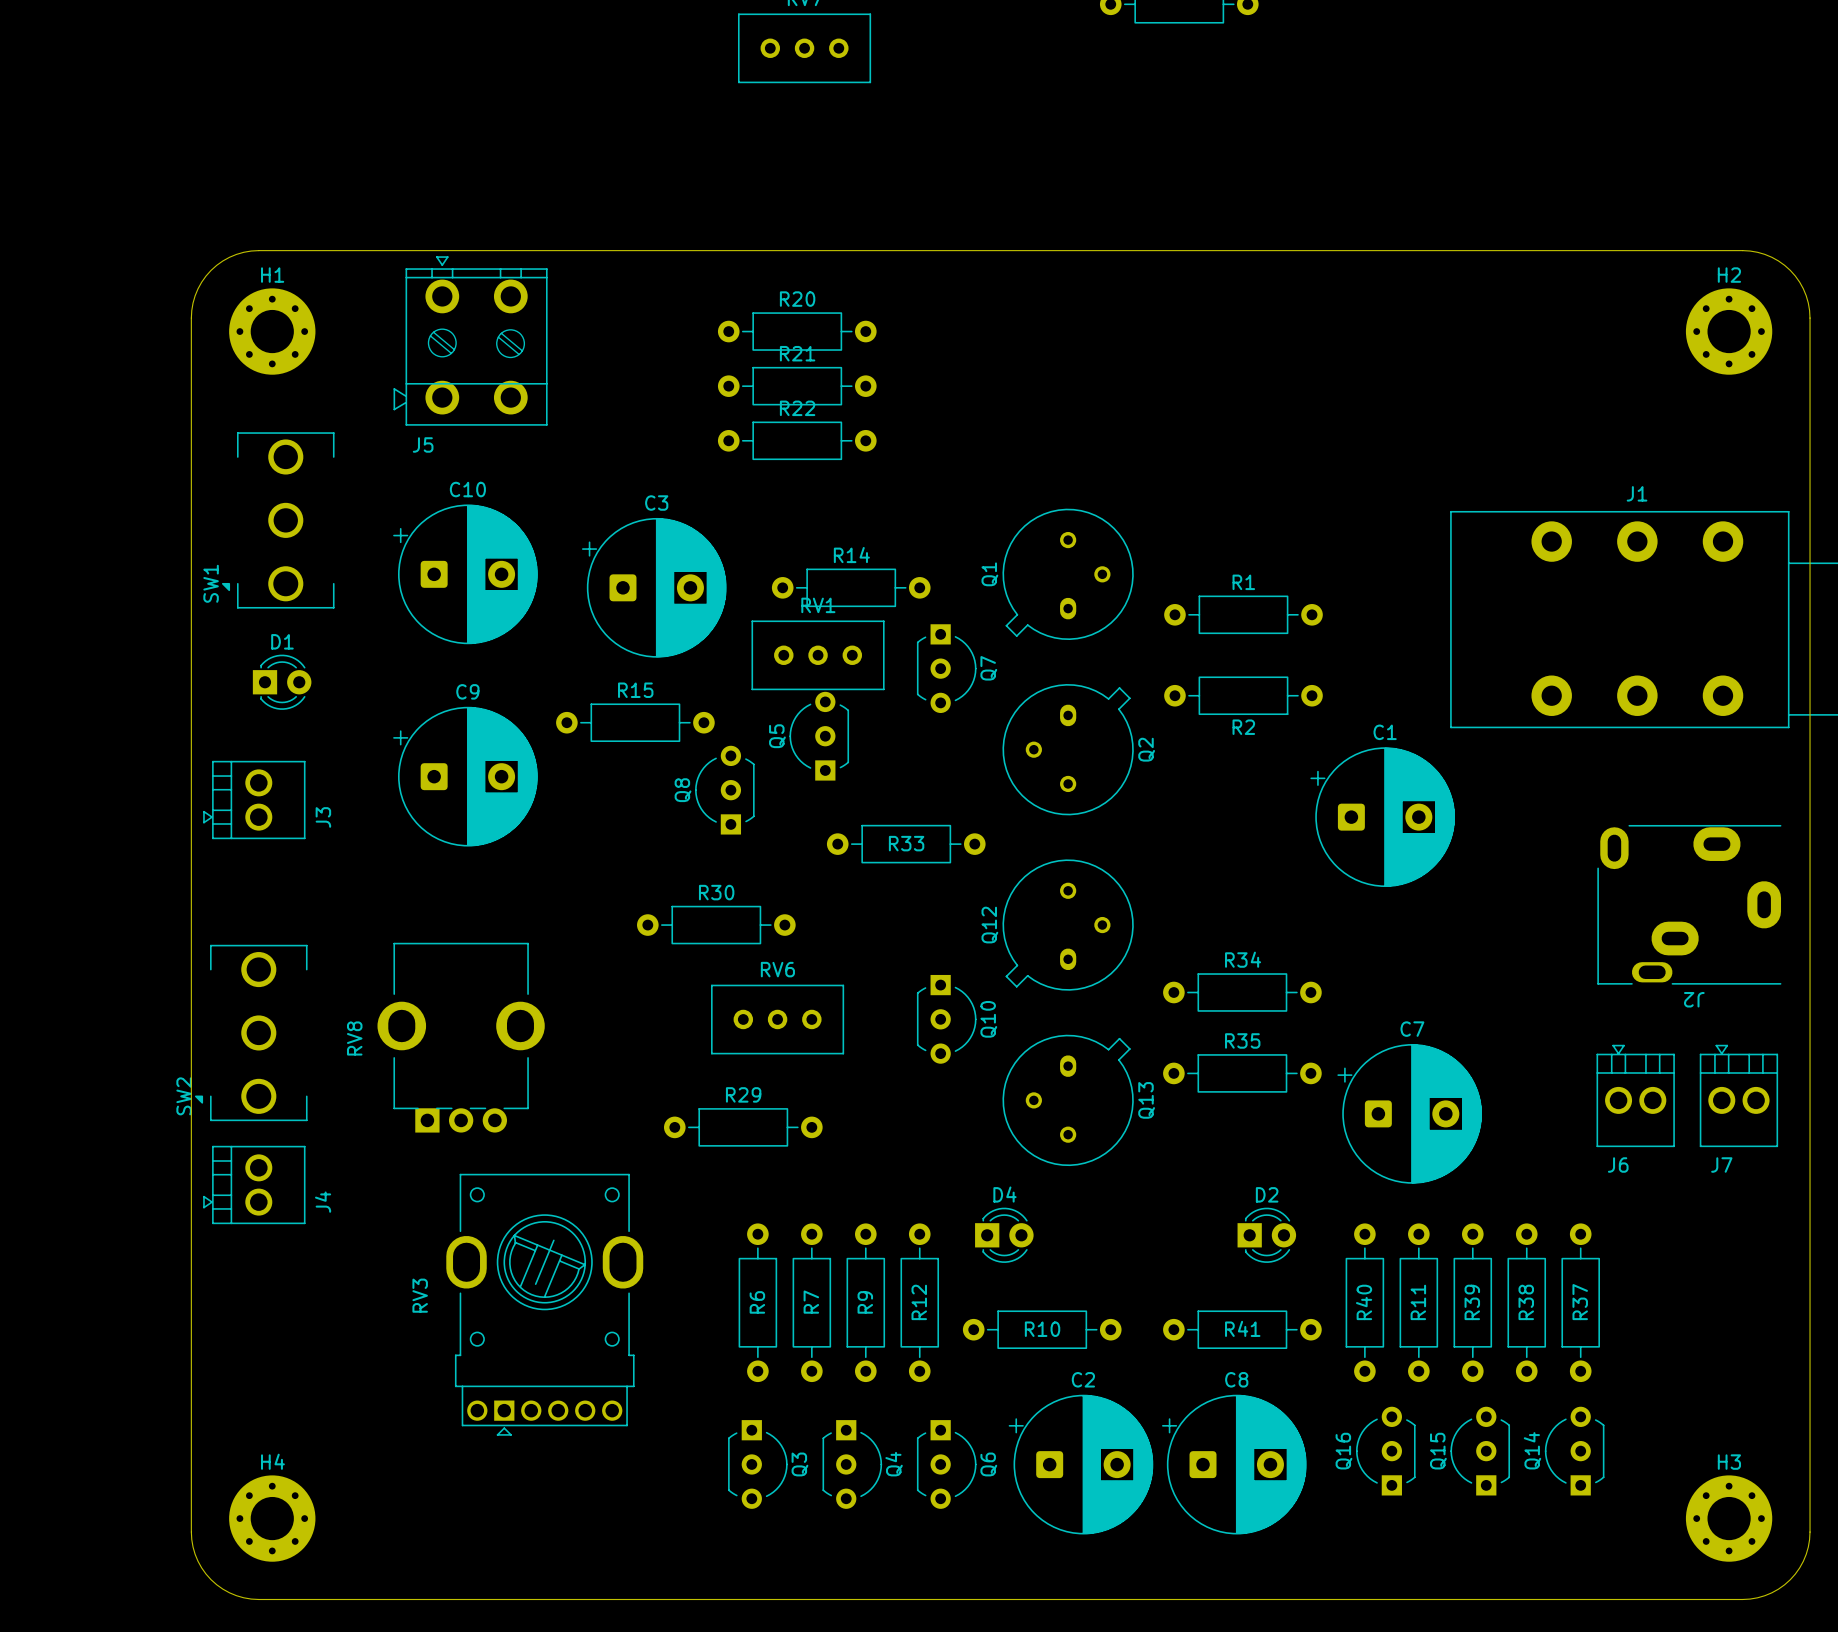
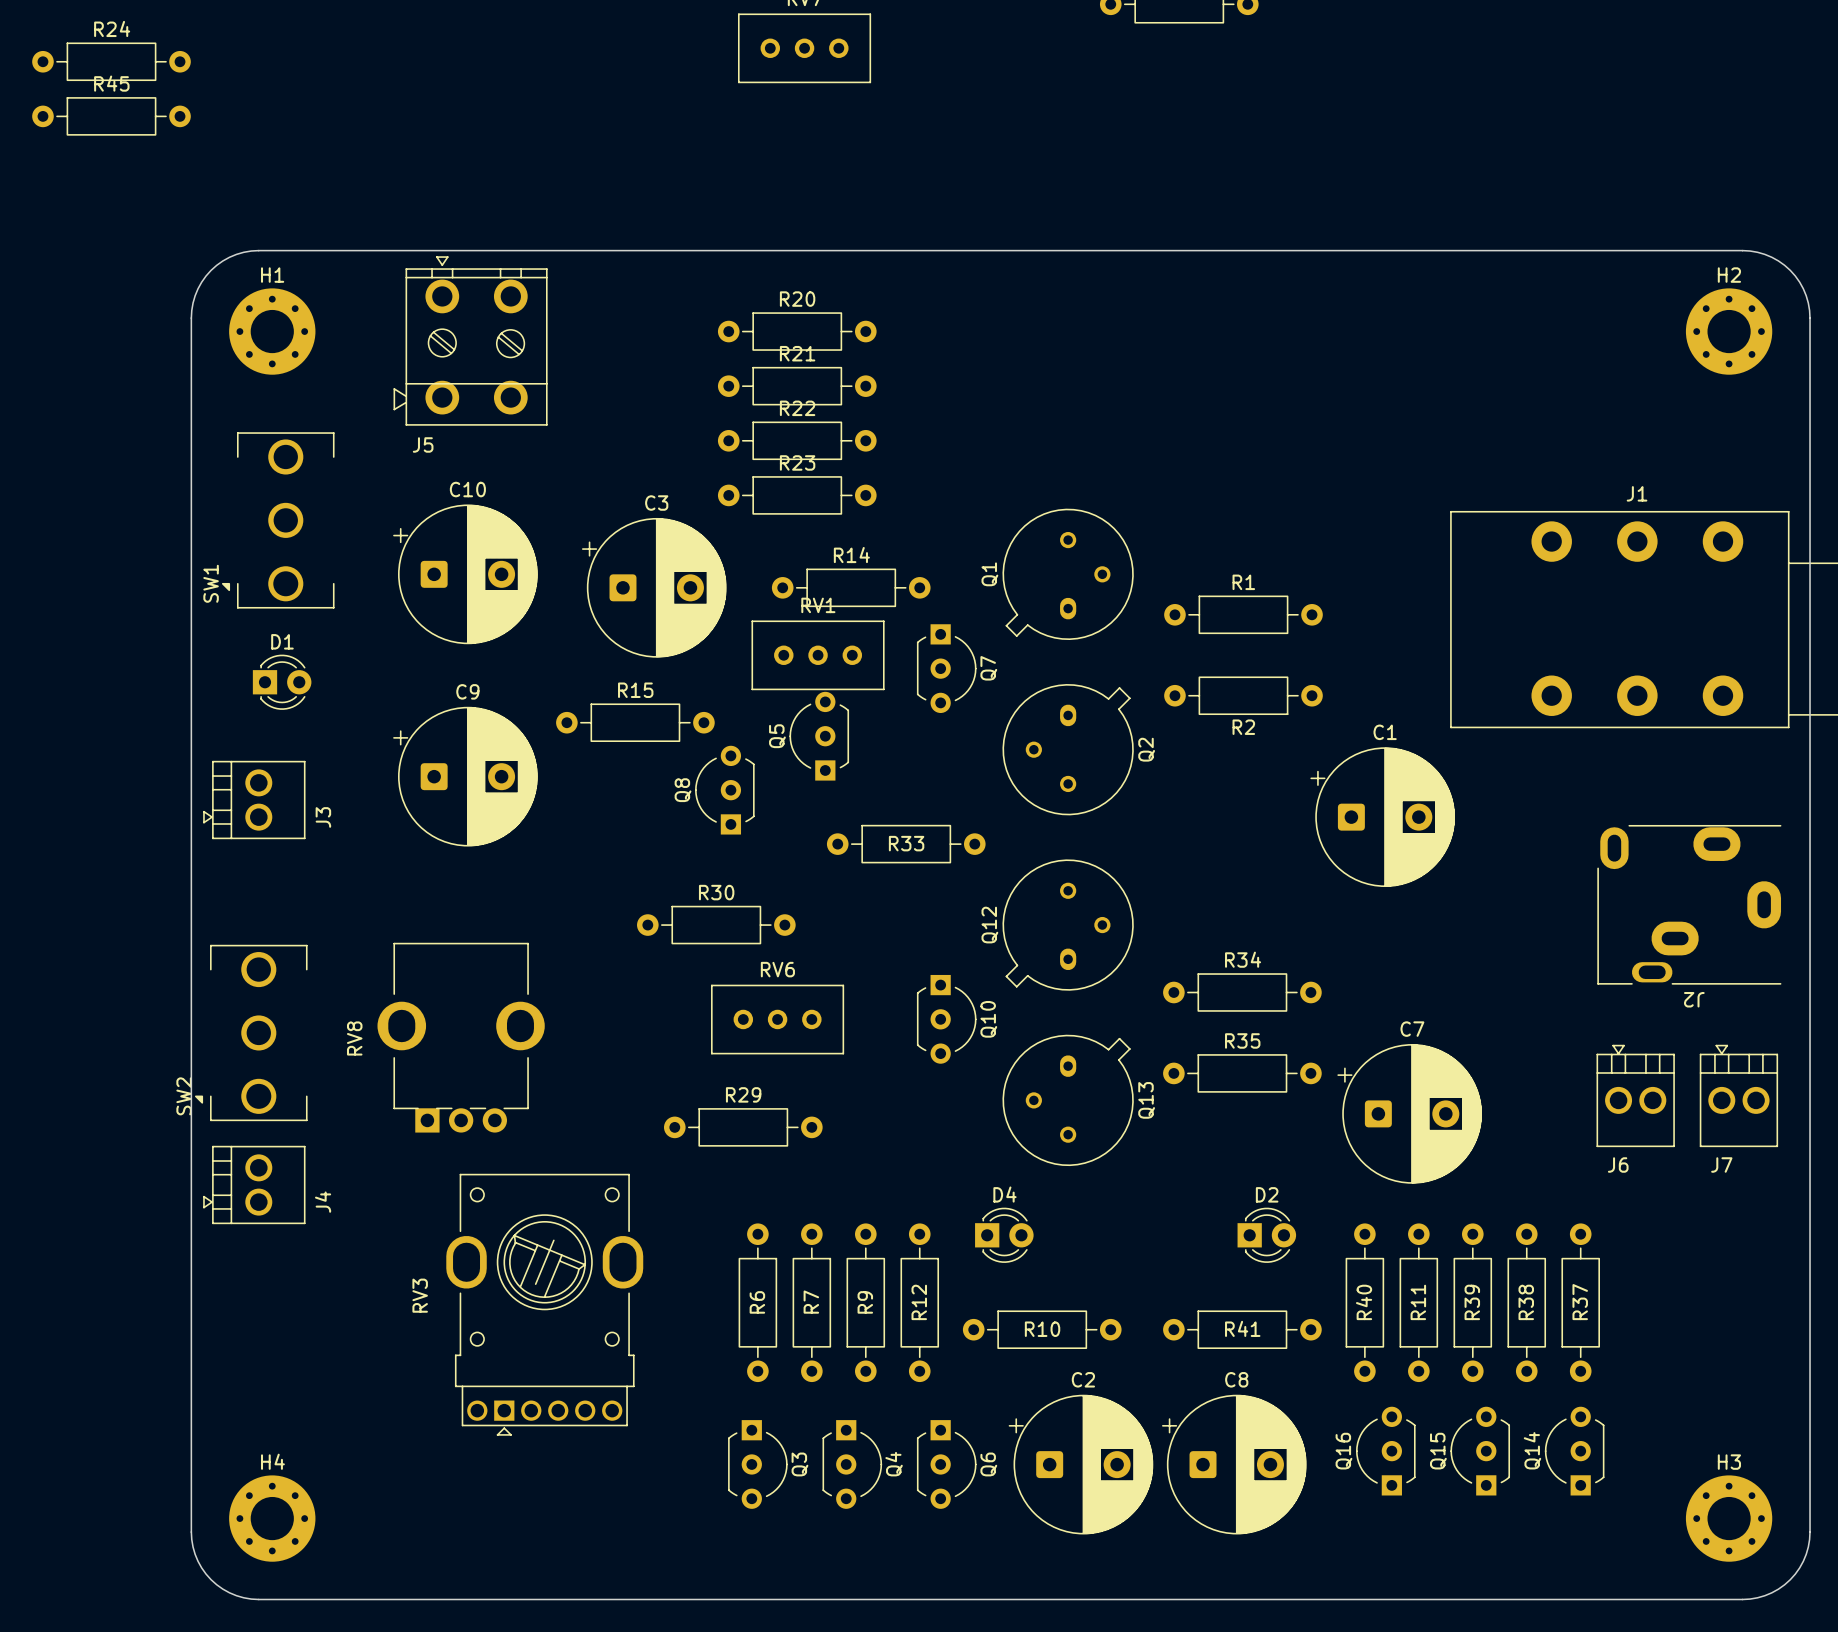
R24: none -> (111, 61)
R45: none -> (111, 116)
R23: none -> (797, 495)

